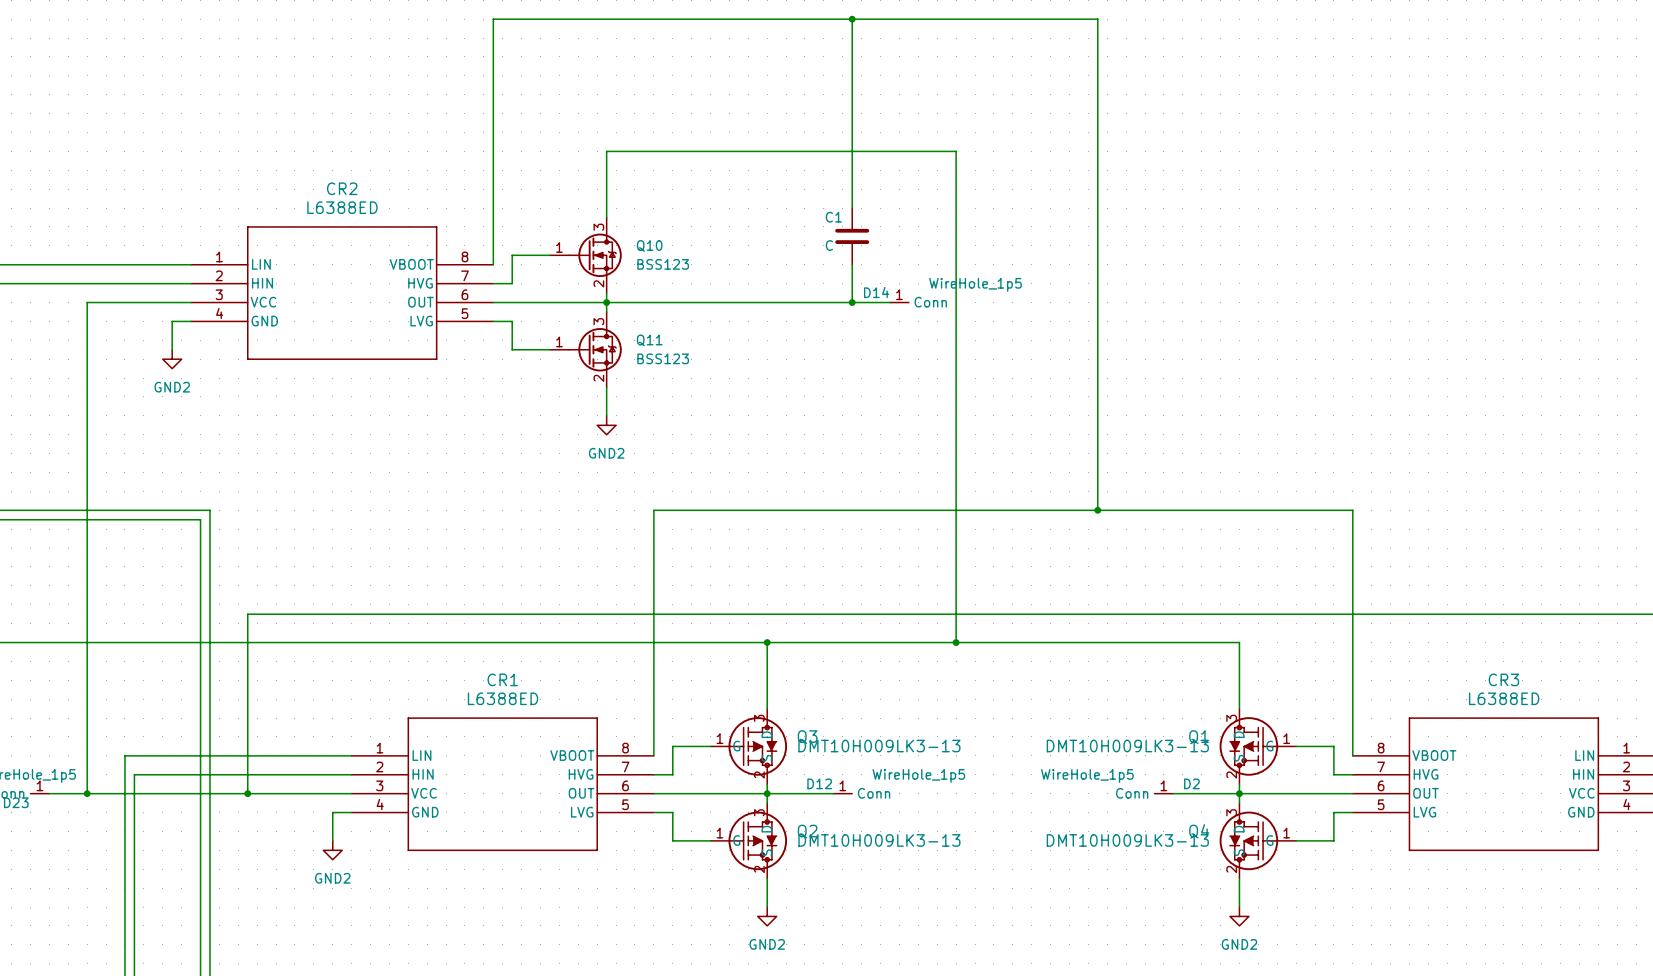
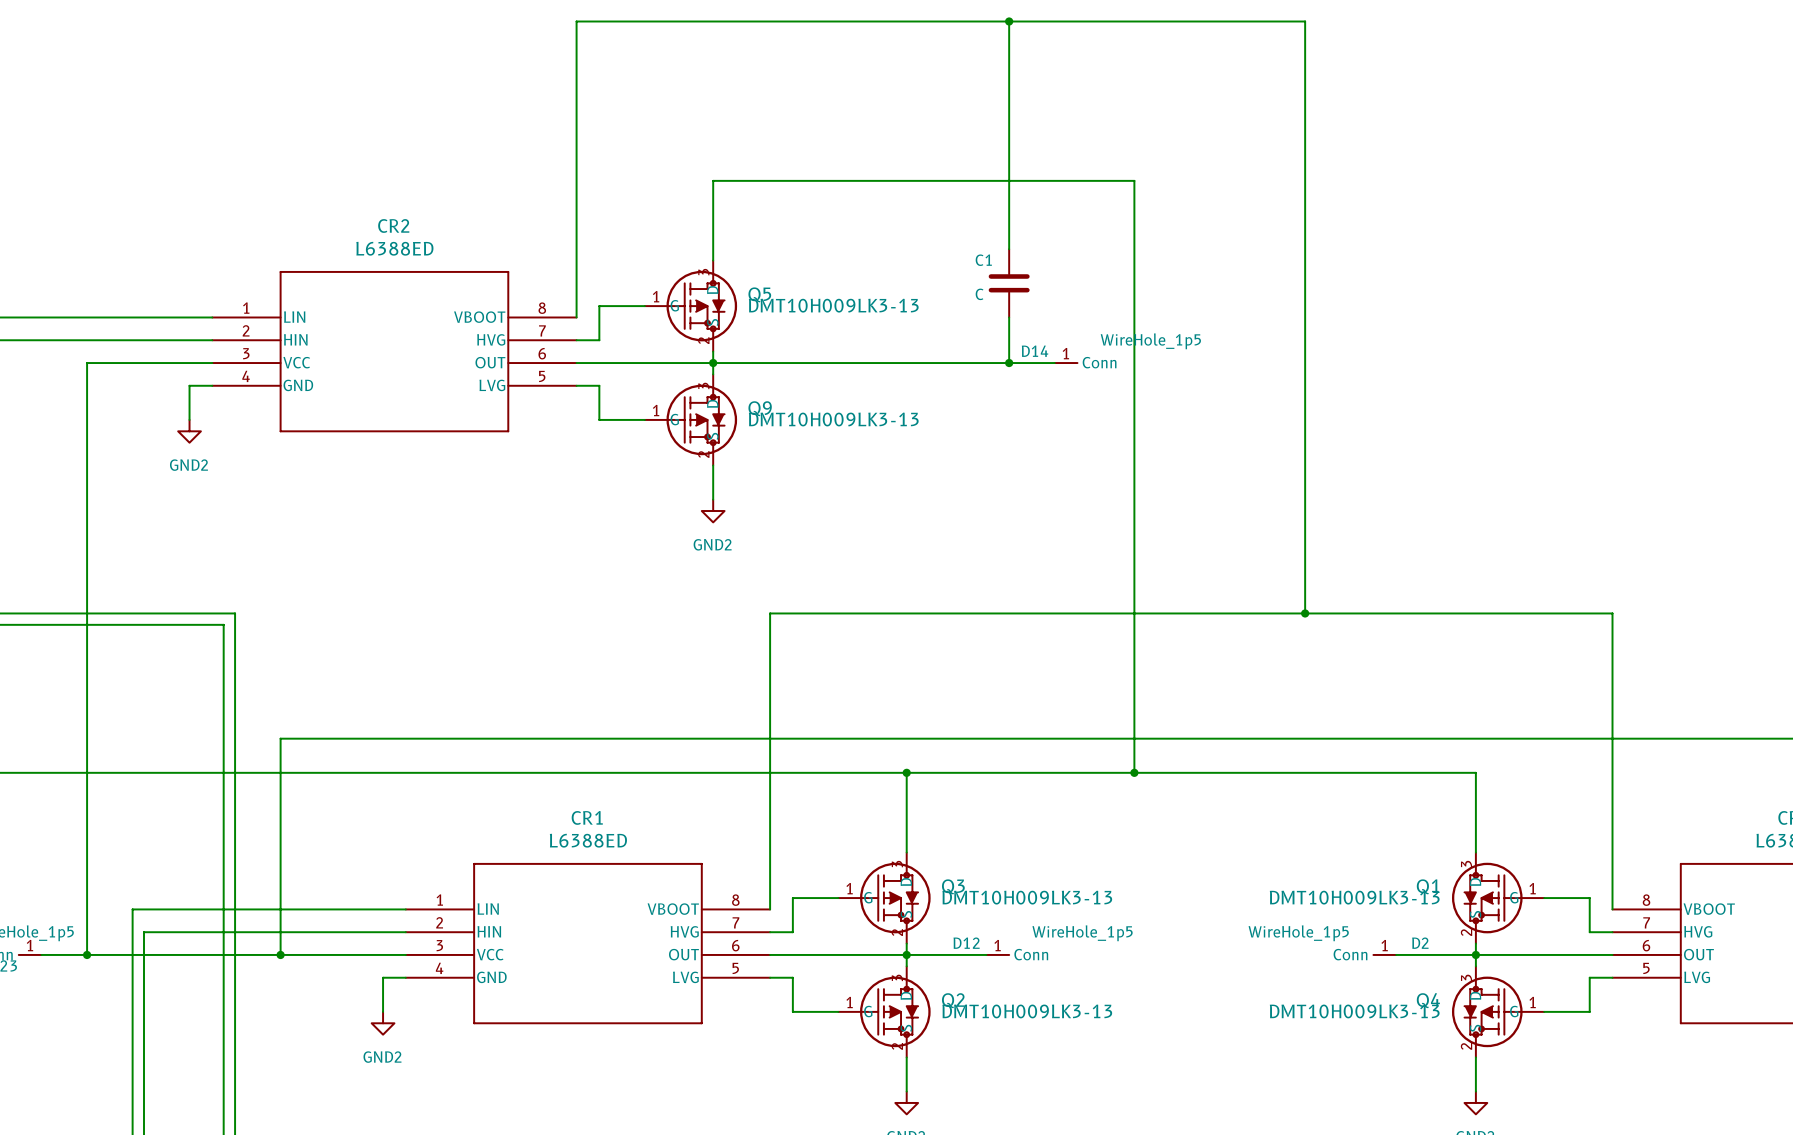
Q10: BSS123 (585, 255) -> none
Q5: none -> DMT10H009LK3-13 (690, 306)
Q11: BSS123 (585, 349) -> none
Q9: none -> DMT10H009LK3-13 (690, 419)

